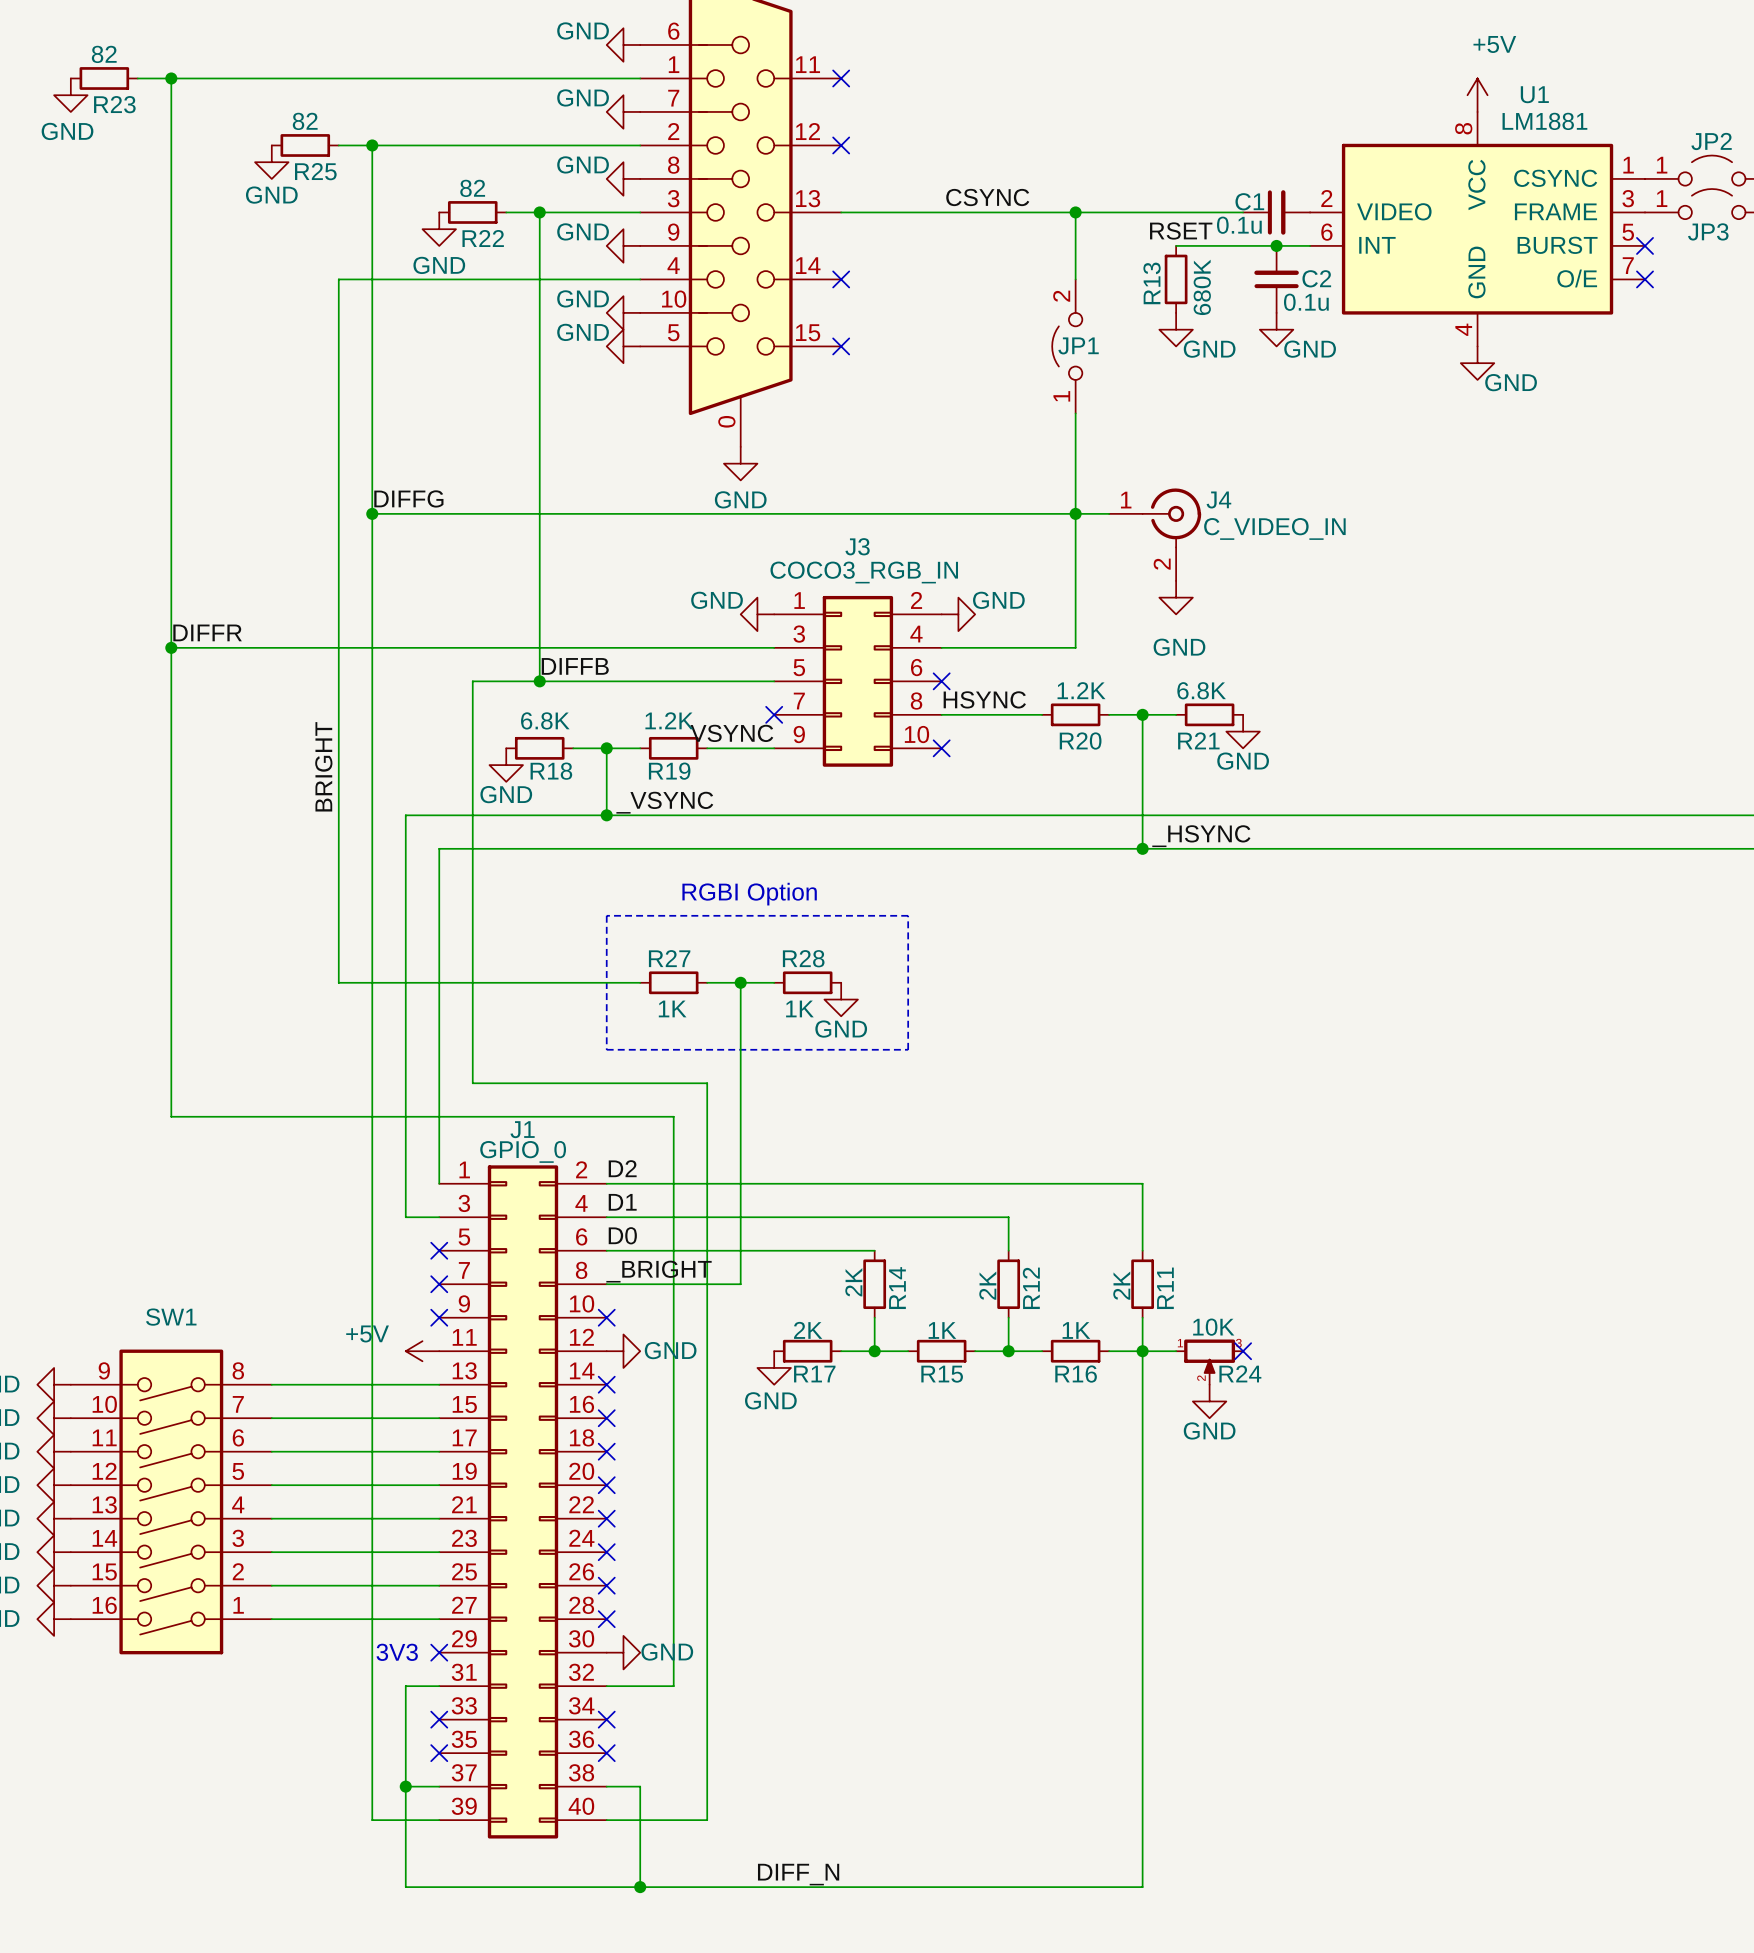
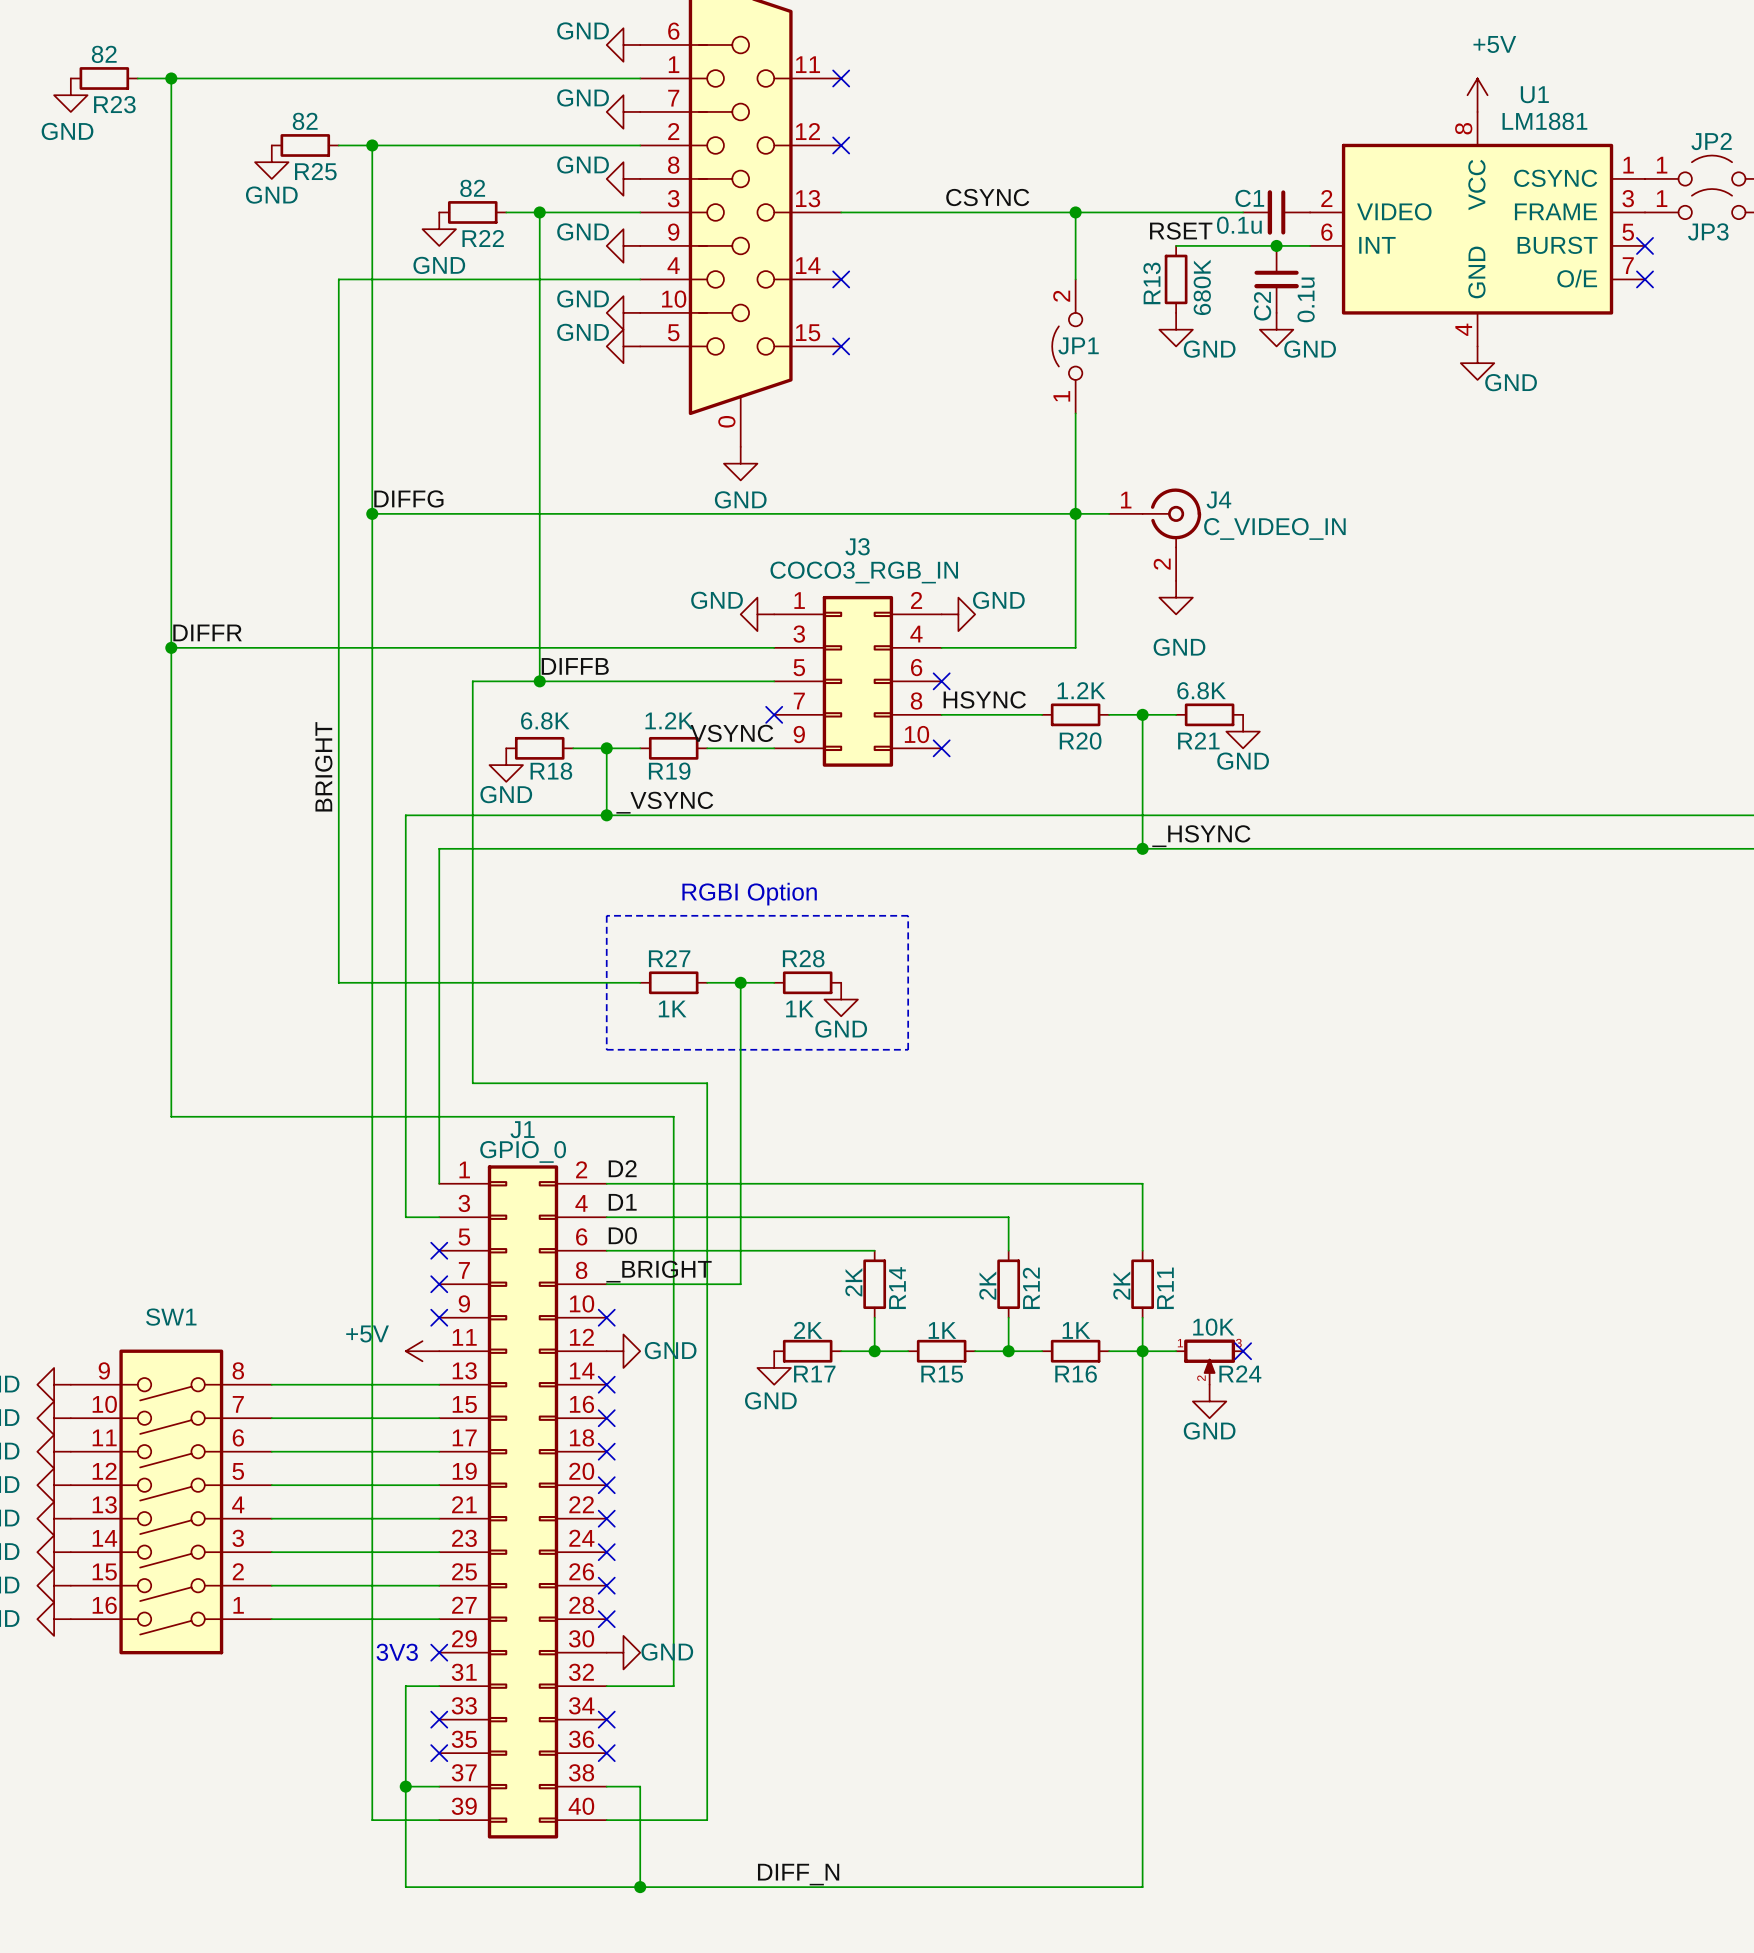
C1 rotation: 0° (1276, 212) -> 180° (1276, 212)
C2 name position: C2 (1316, 278) -> C2 (1262, 306)
C2 rotation: 0° (1276, 279) -> 180° (1276, 279)

